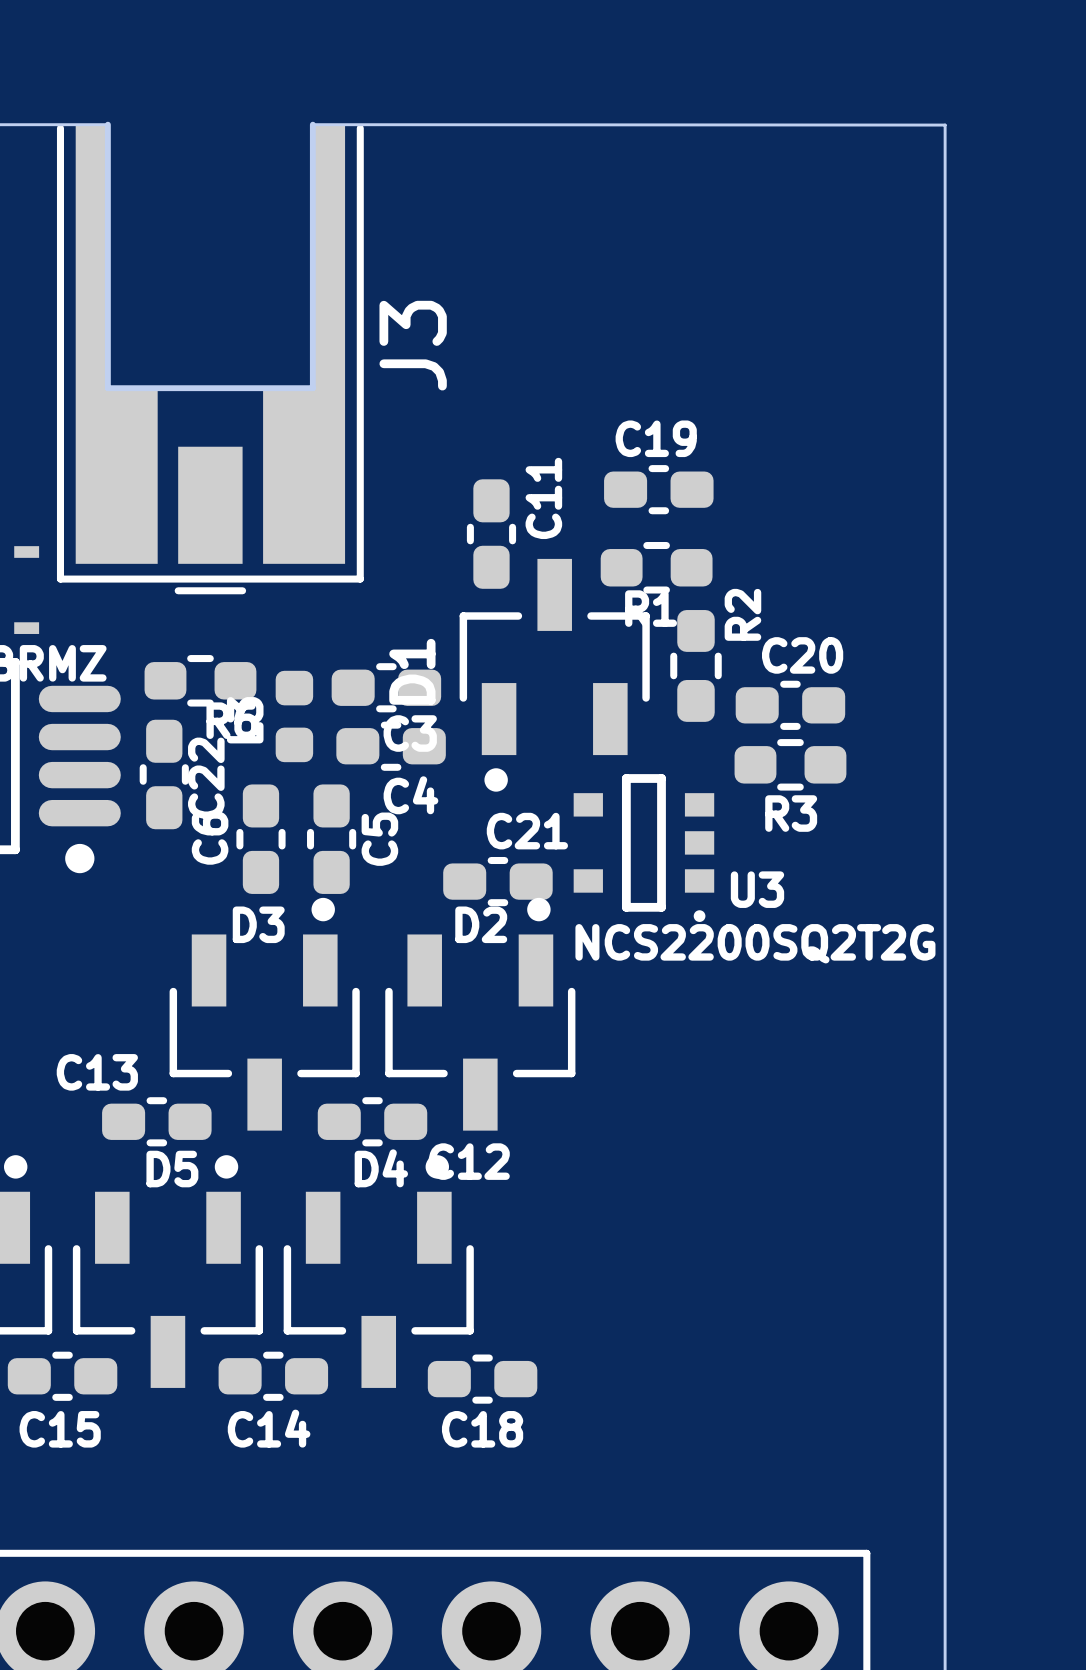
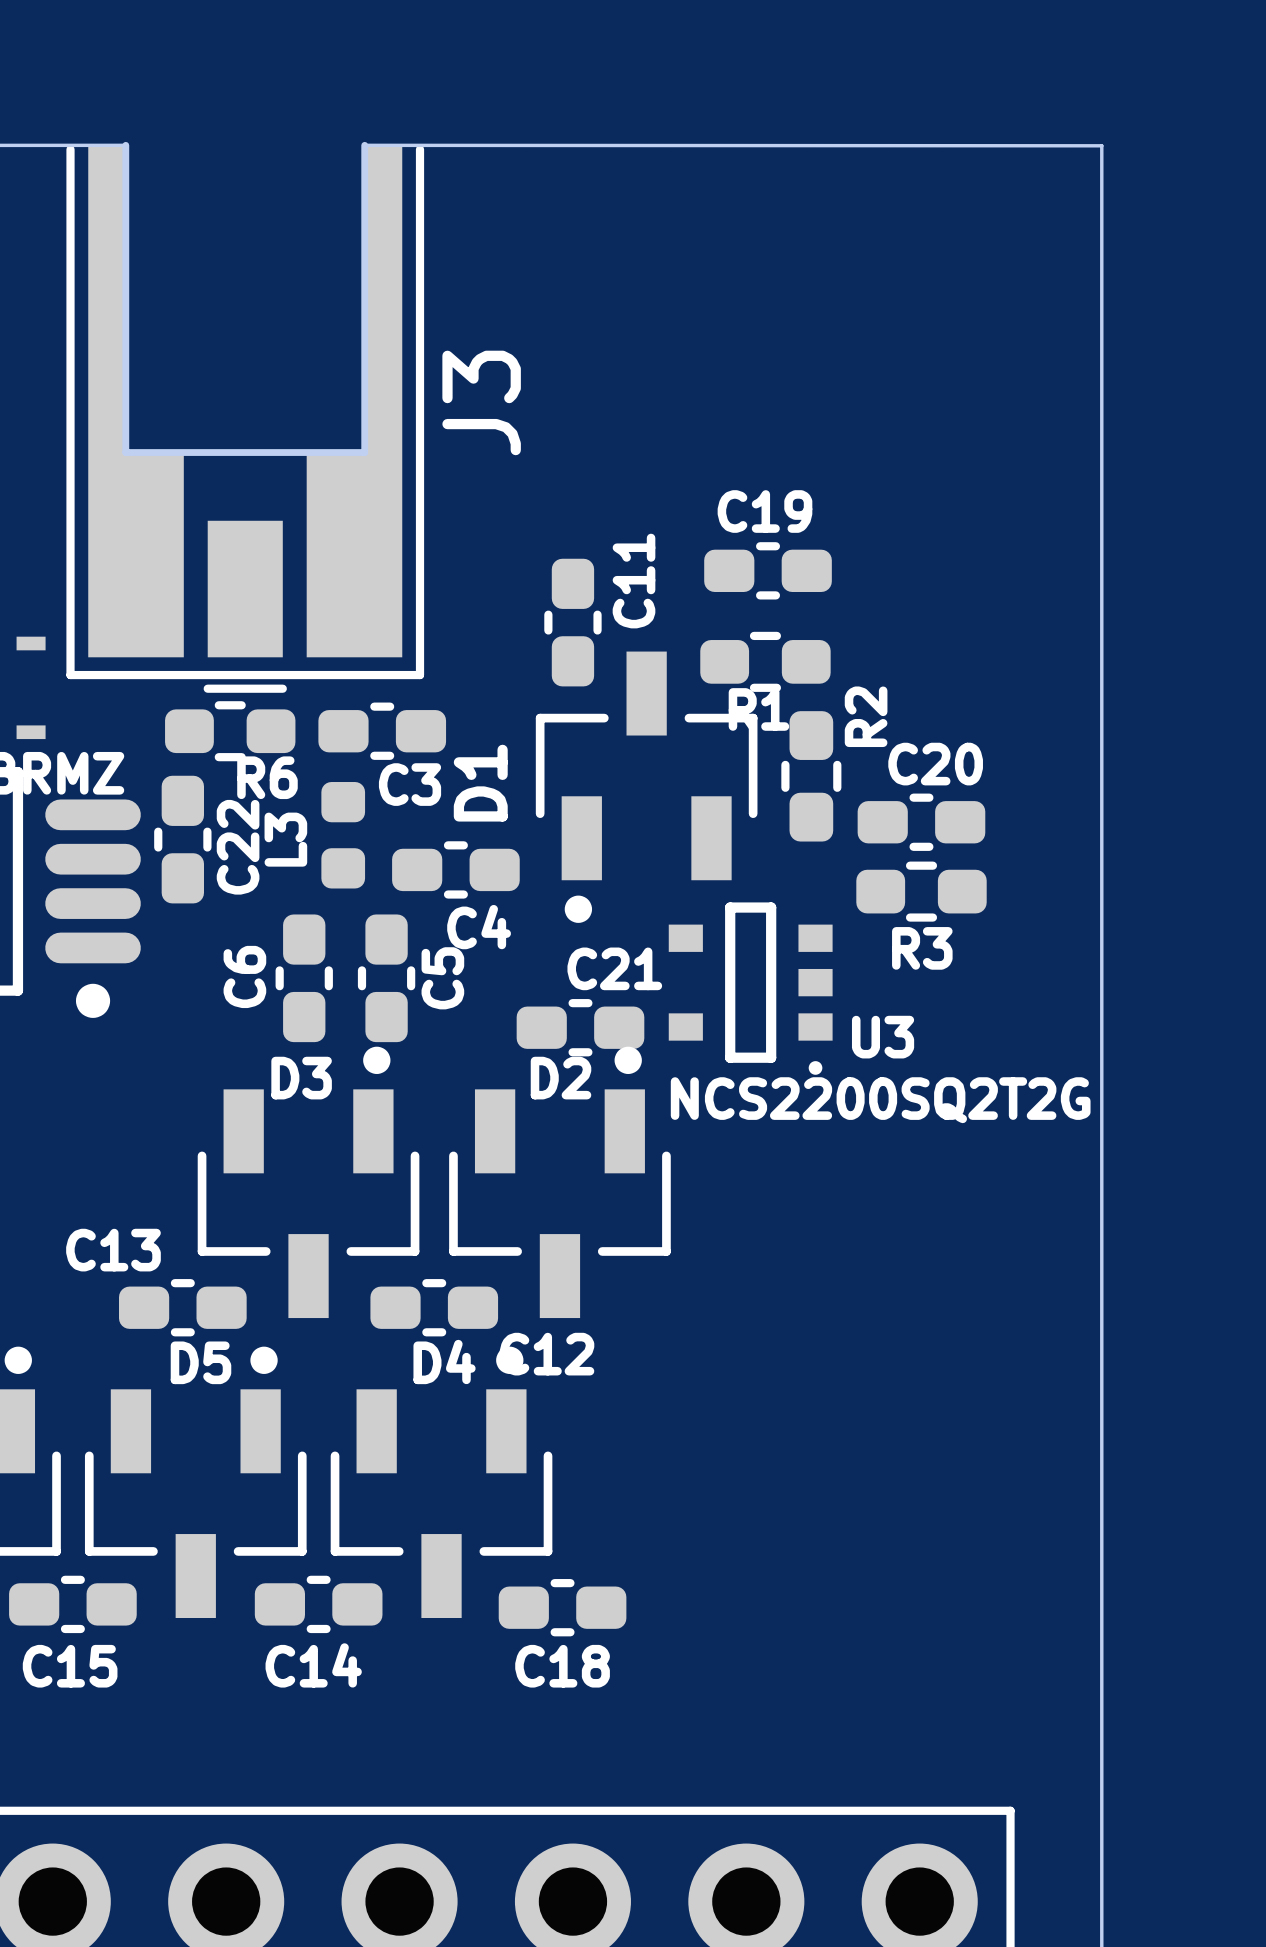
R6 position: (200, 680) -> (230, 731)
C3 position: (386, 687) -> (382, 731)
C22 position: (164, 774) -> (182, 839)
C22 name position: C22 (206, 778) -> C22 (238, 847)

